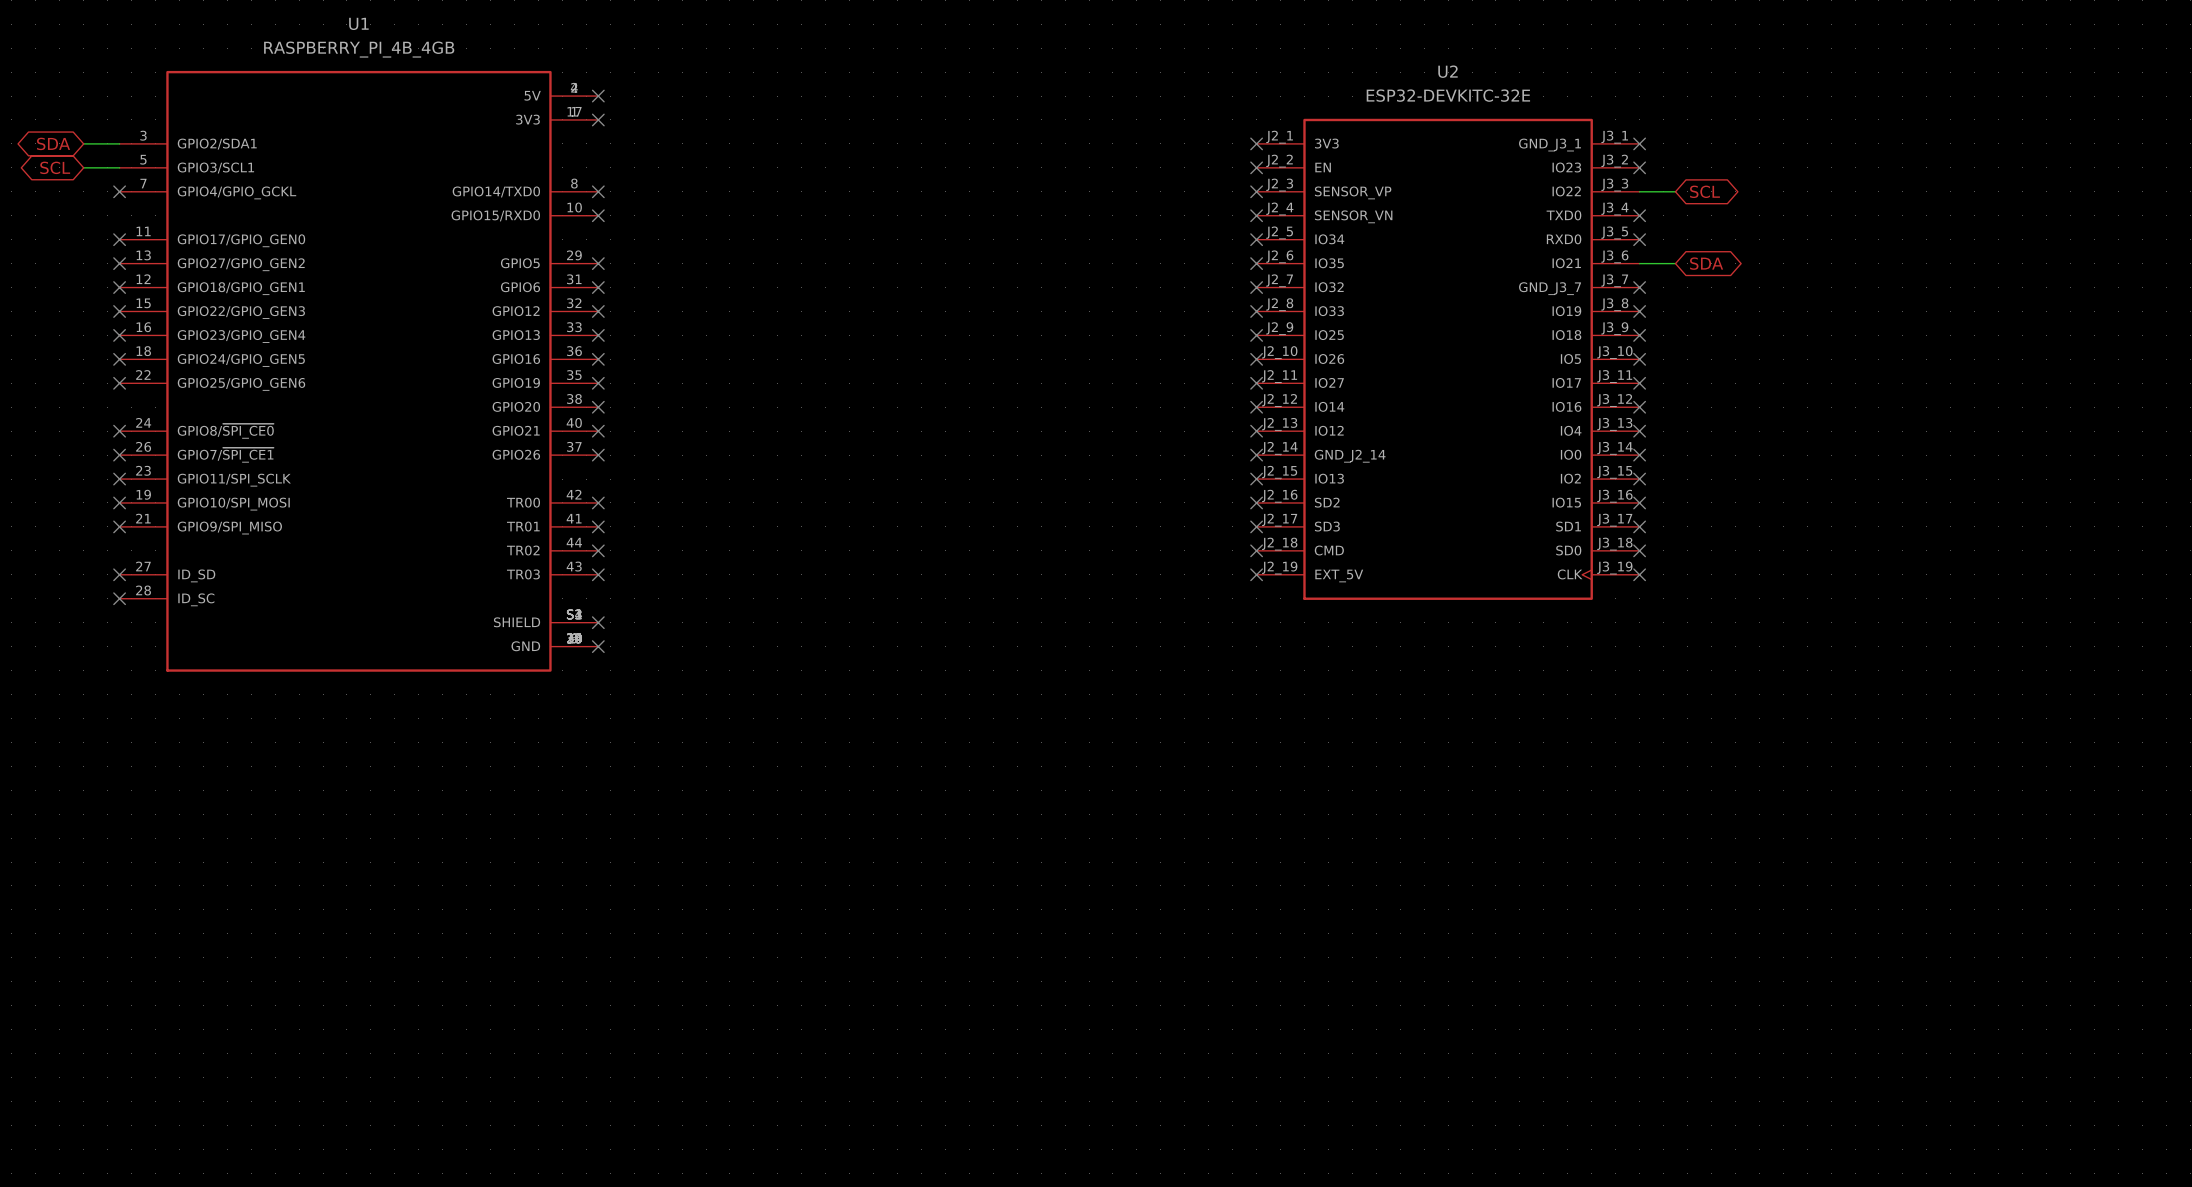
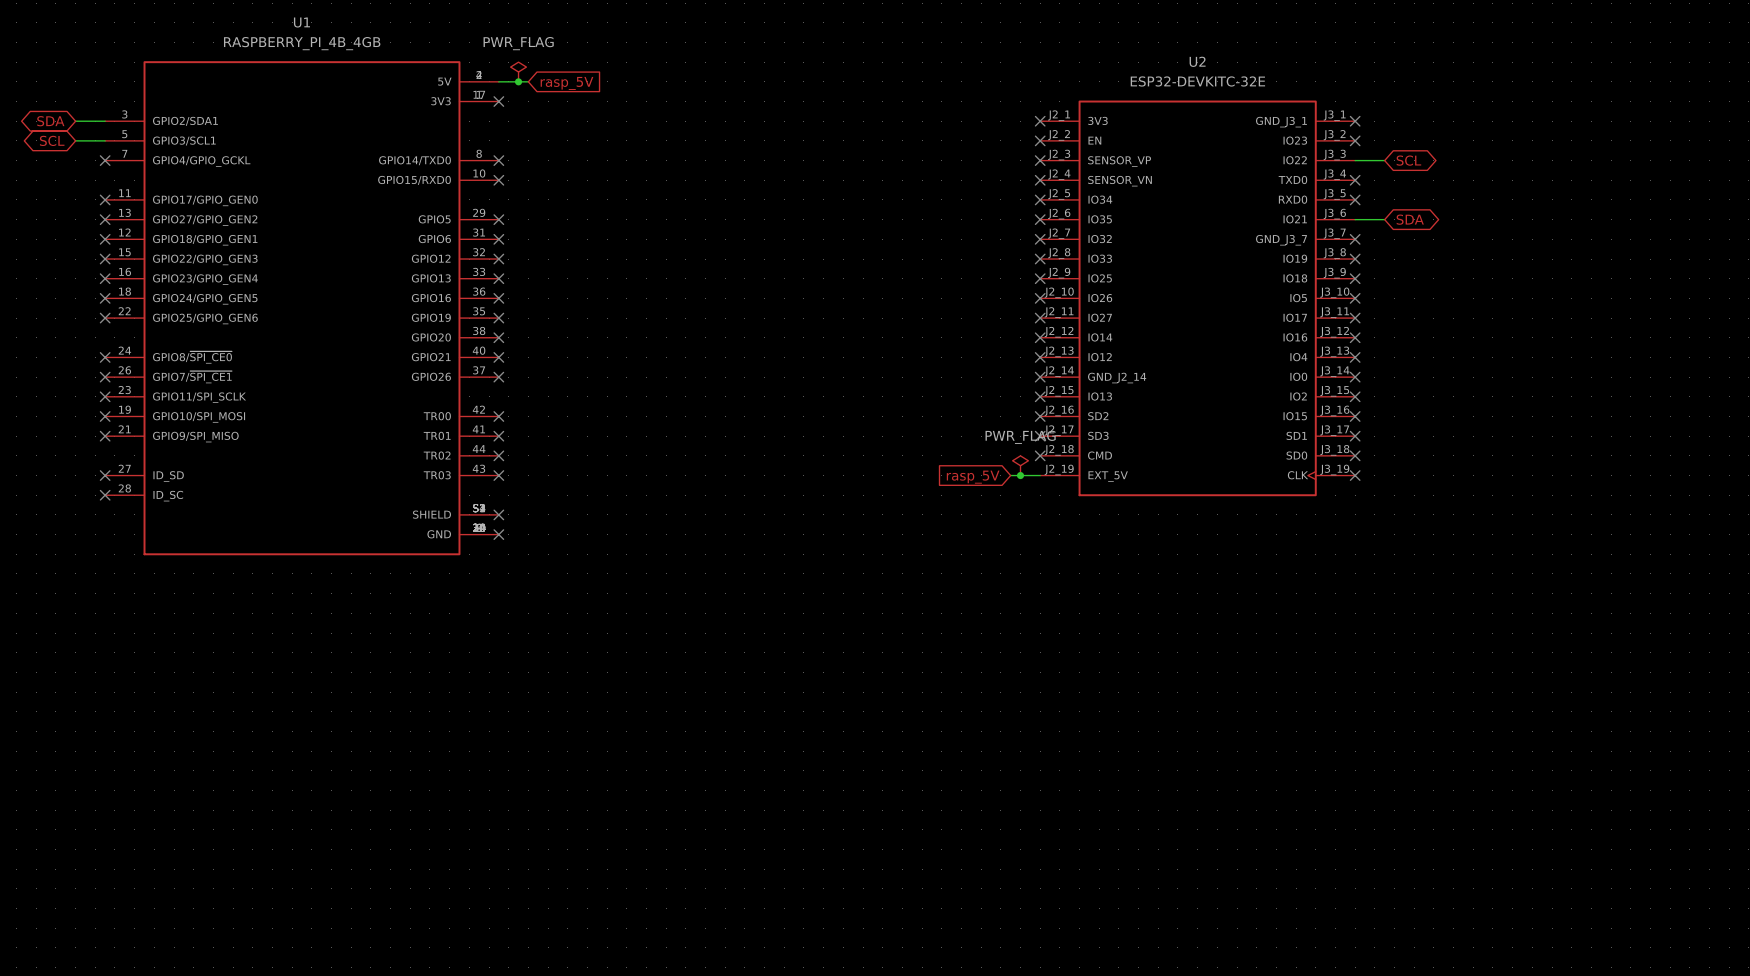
power symbol: none -> PWR_FLAG (518, 72)
wire: none -> (498, 81) (528, 81)
no-connect mark: (598, 96) -> none
junction: none -> (518, 81)
global label: none -> rasp_5V (567, 83)
power symbol: none -> PWR_FLAG (1020, 465)
wire: none -> (1010, 475) (1040, 475)
junction: none -> (1020, 475)
no-connect mark: (1256, 574) -> none
global label: none -> rasp_5V (973, 477)

